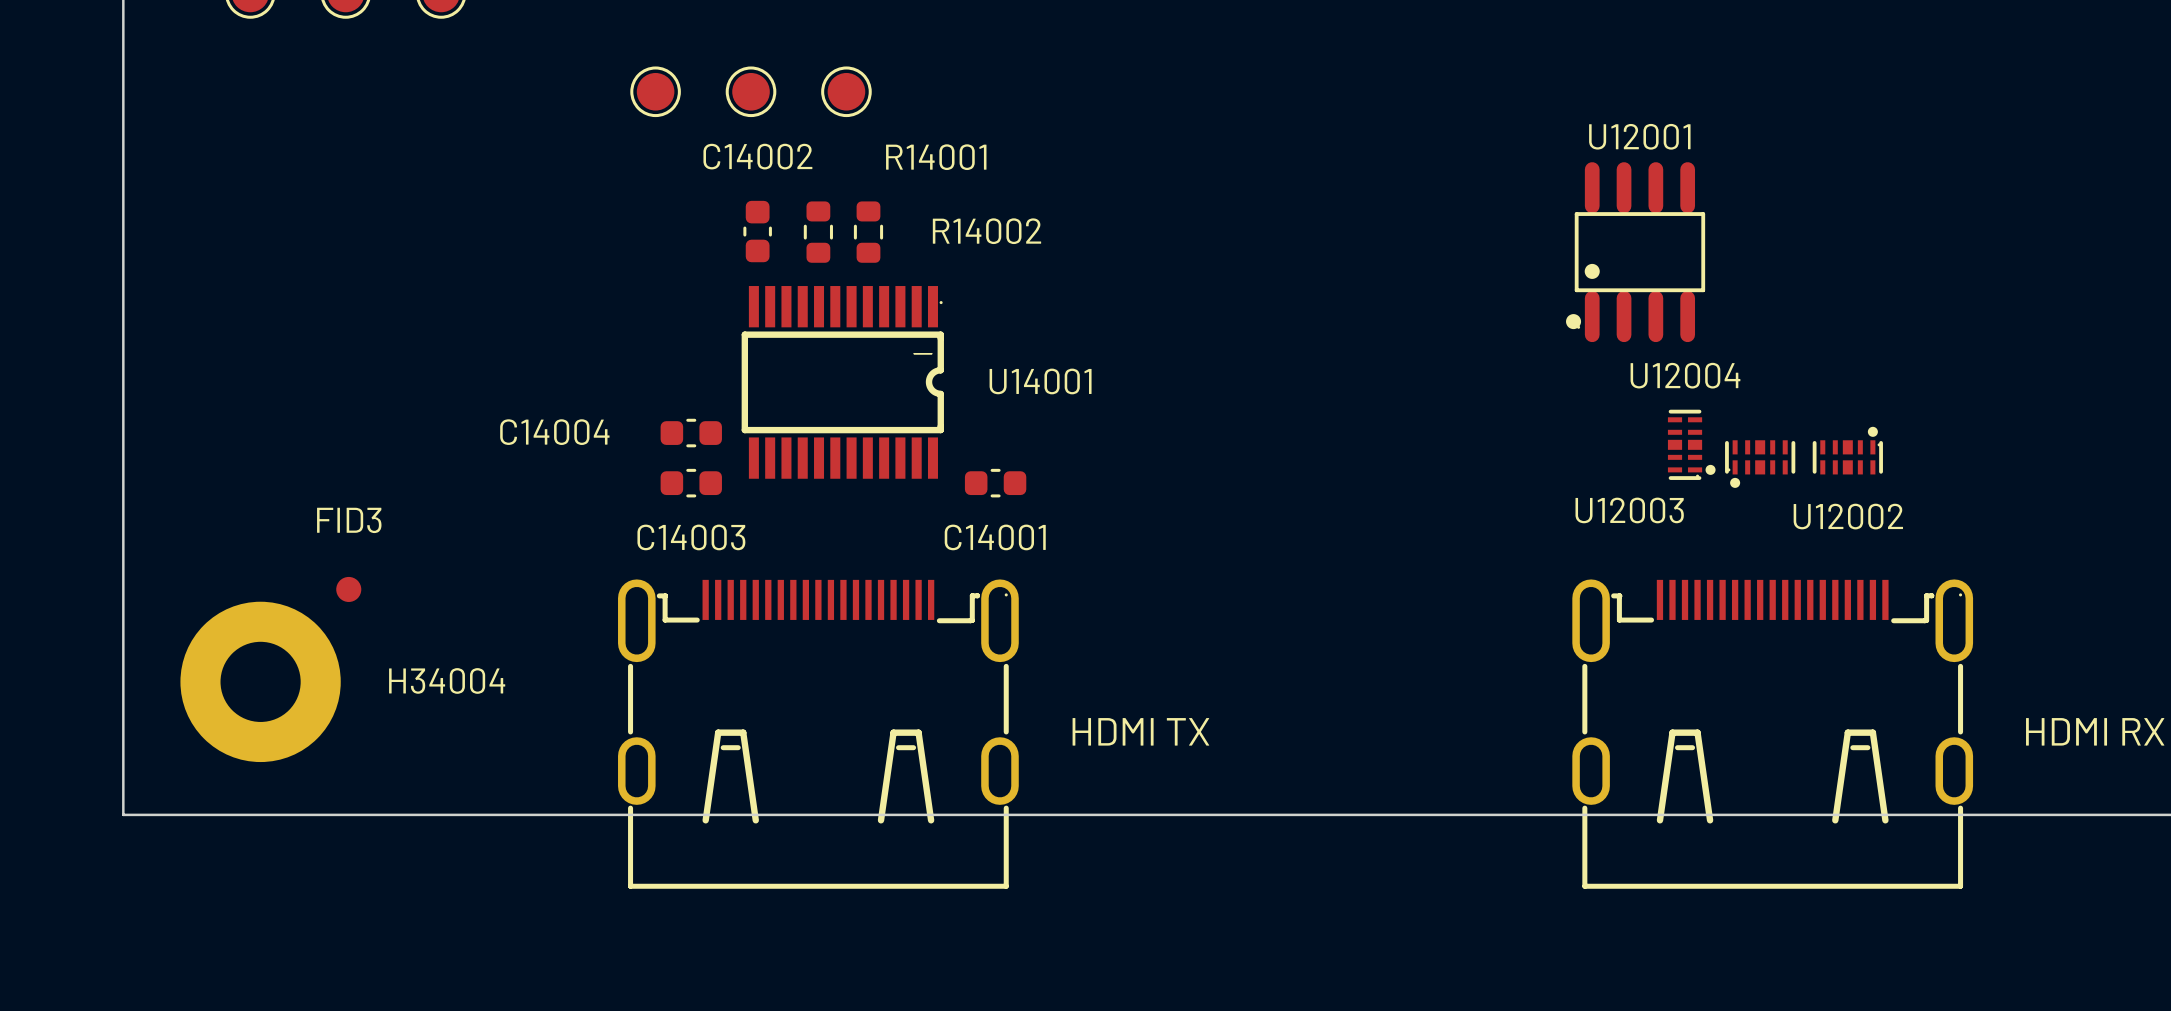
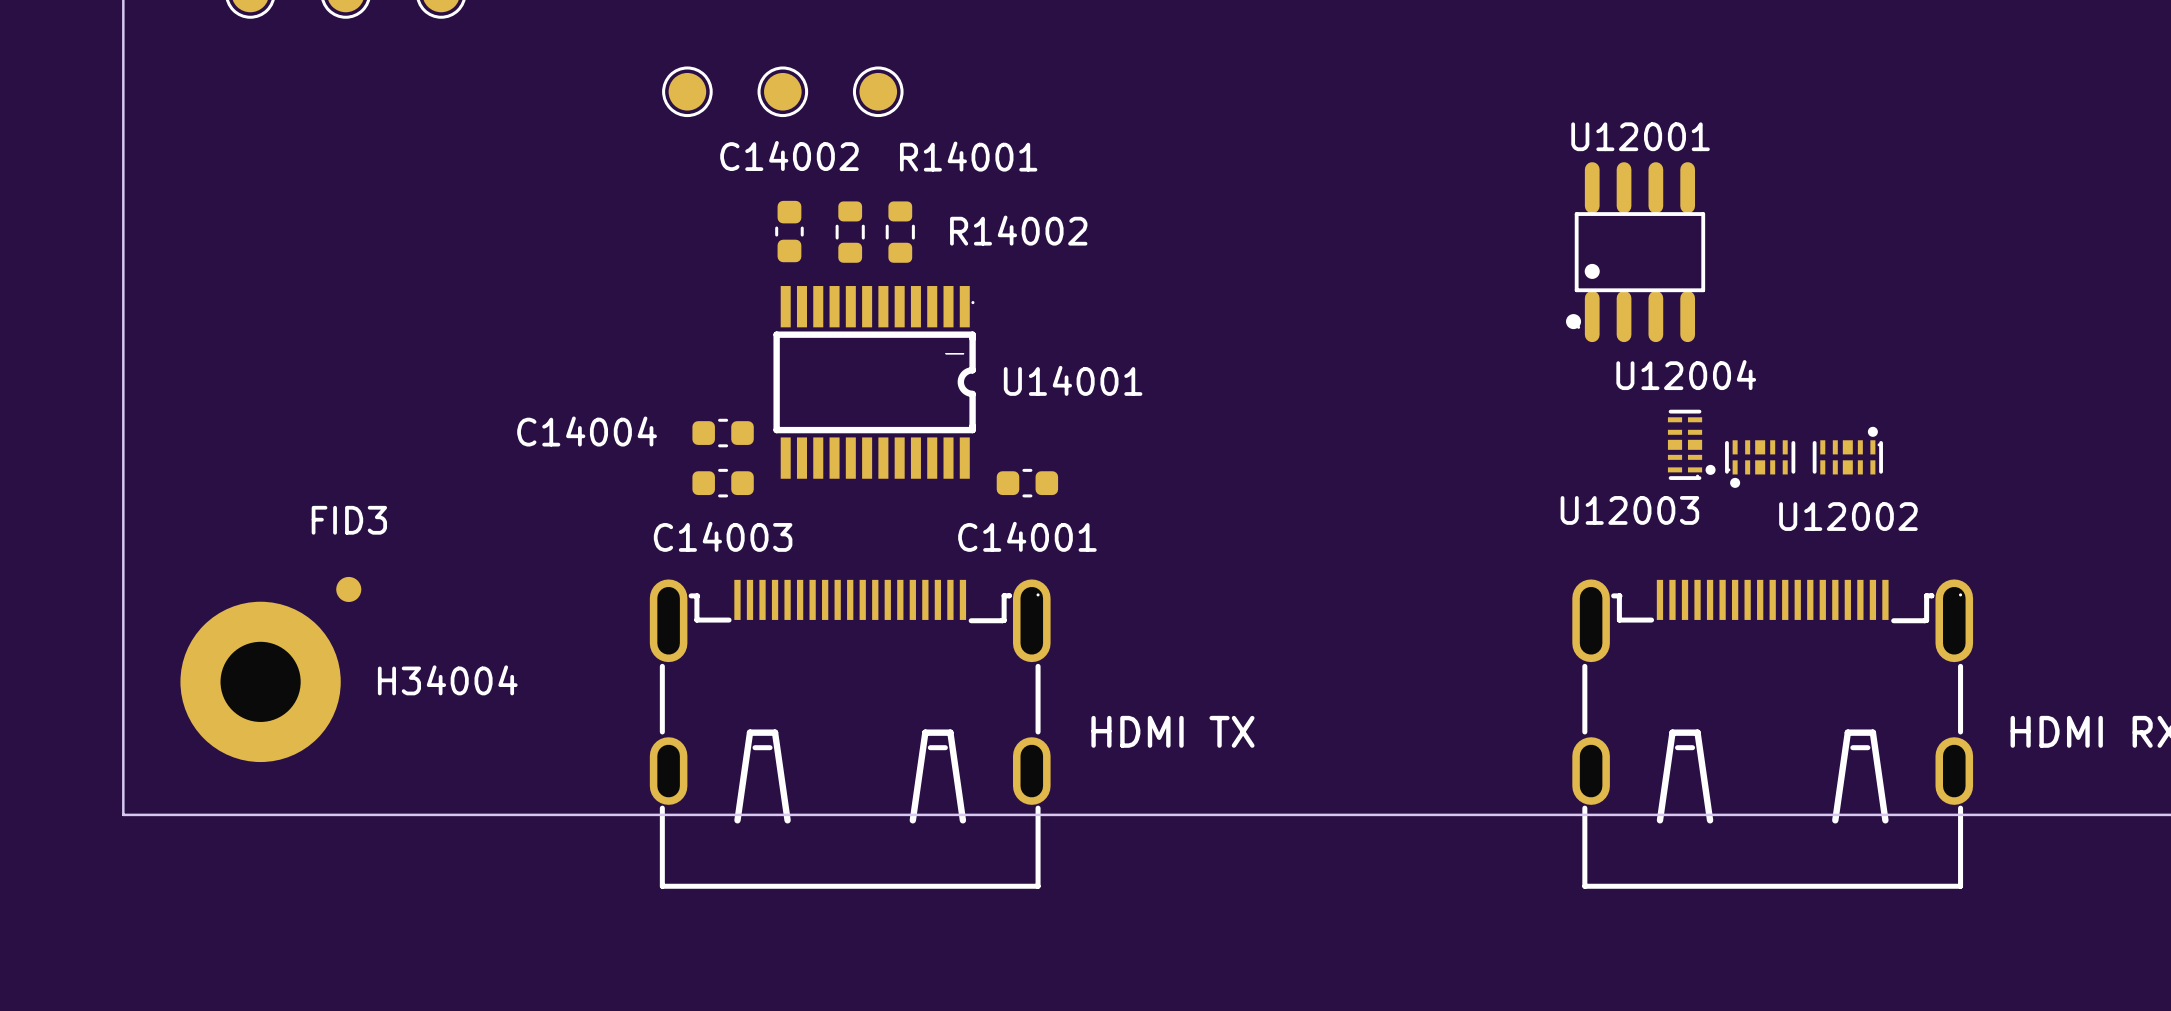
part: (655, 91) -> none
part: none -> (687, 91)
part: (751, 91) -> none
part: none -> (782, 91)
part: (846, 91) -> none
part: none -> (878, 91)
C14002 position: (757, 231) -> (789, 231)
R14001 position: (818, 232) -> (850, 232)
R14002 position: (868, 232) -> (900, 232)
U14001 position: (842, 382) -> (874, 382)
C14004 position: (691, 433) -> (723, 433)
C14003 position: (691, 483) -> (723, 483)
C14001 position: (995, 483) -> (1027, 483)
text position: HDMI TX (1140, 731) -> HDMI TX (1172, 731)
part position: (818, 734) -> (850, 734)

